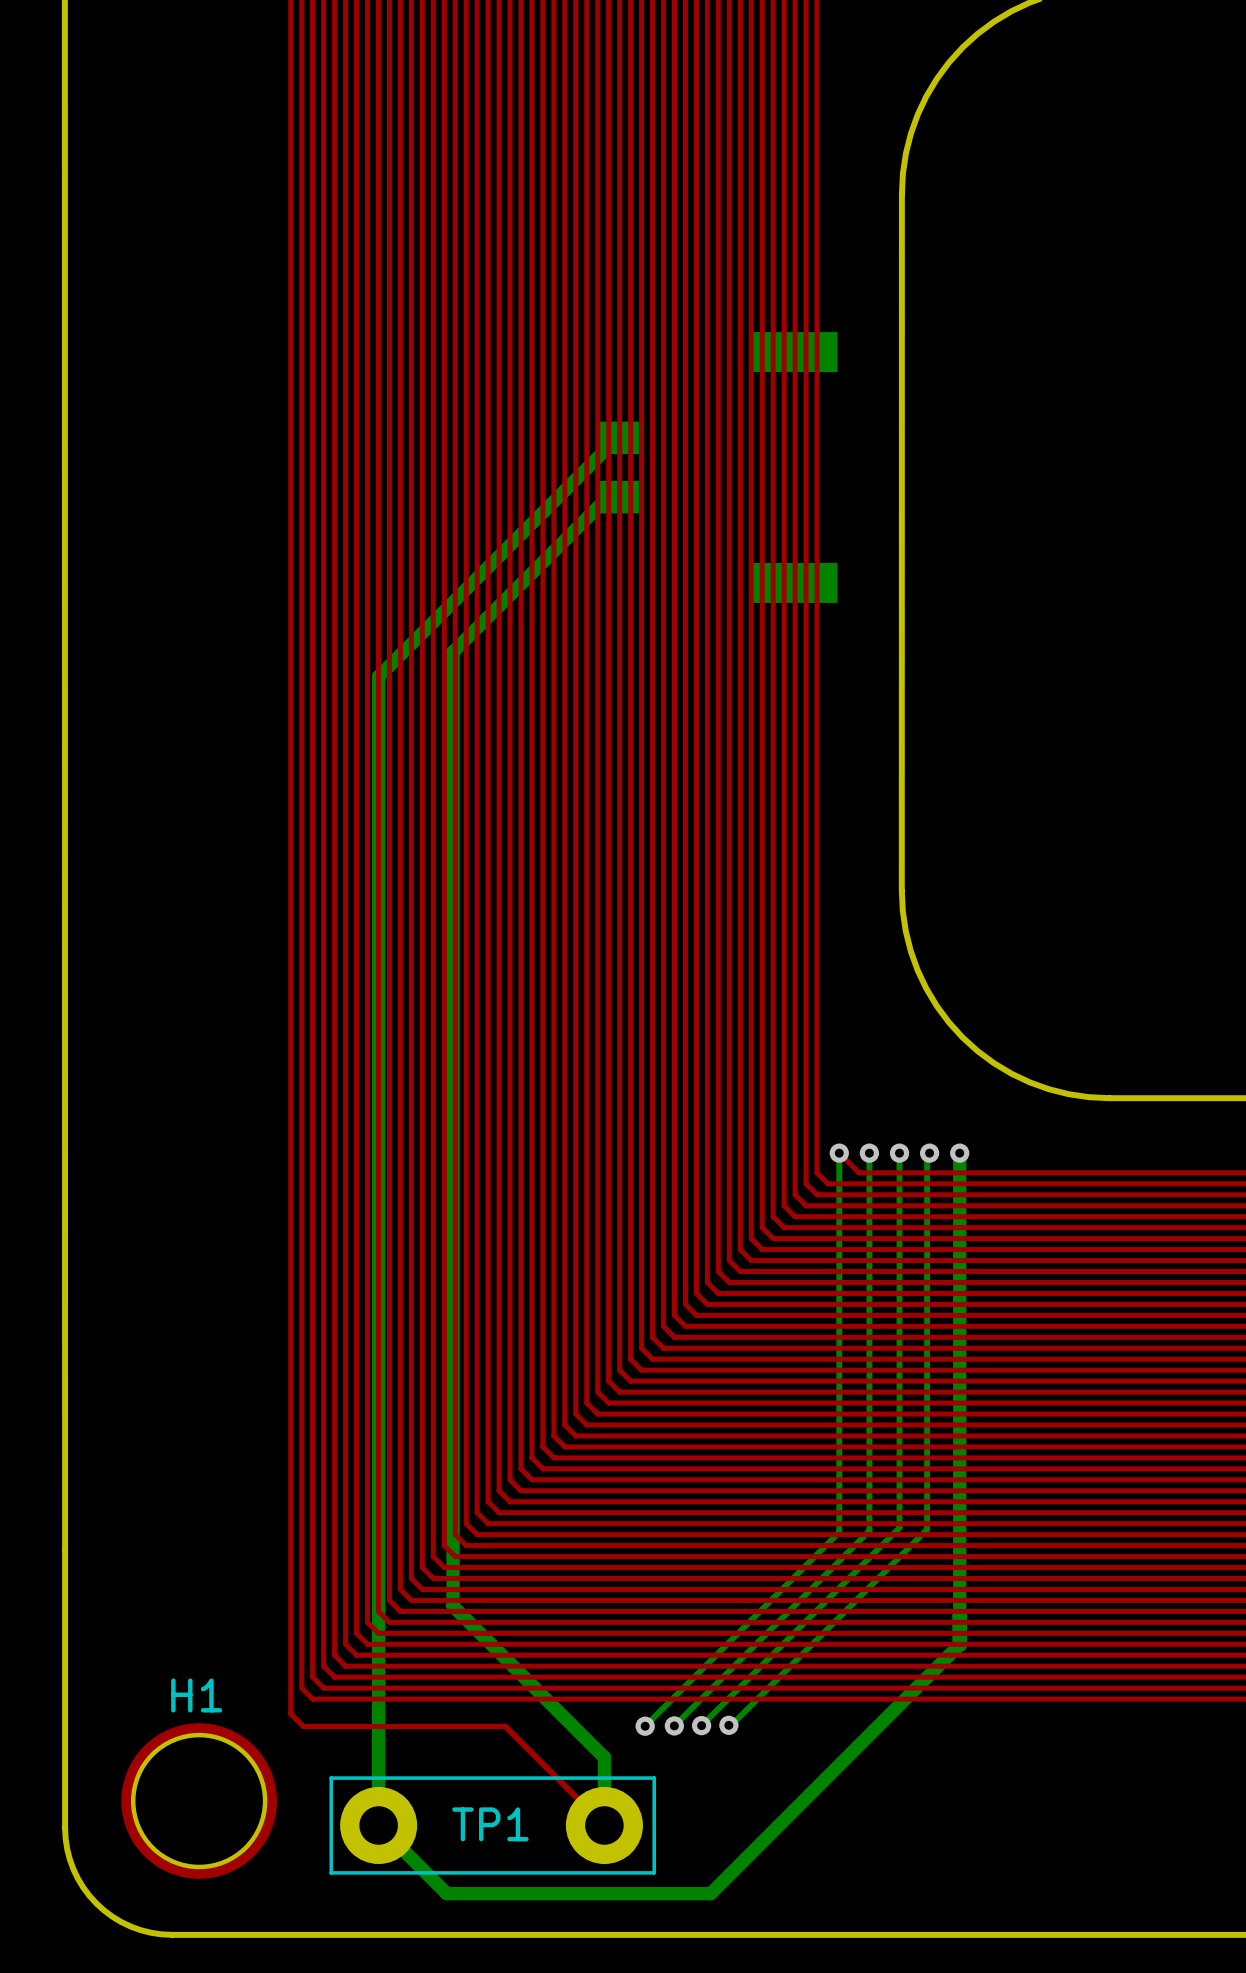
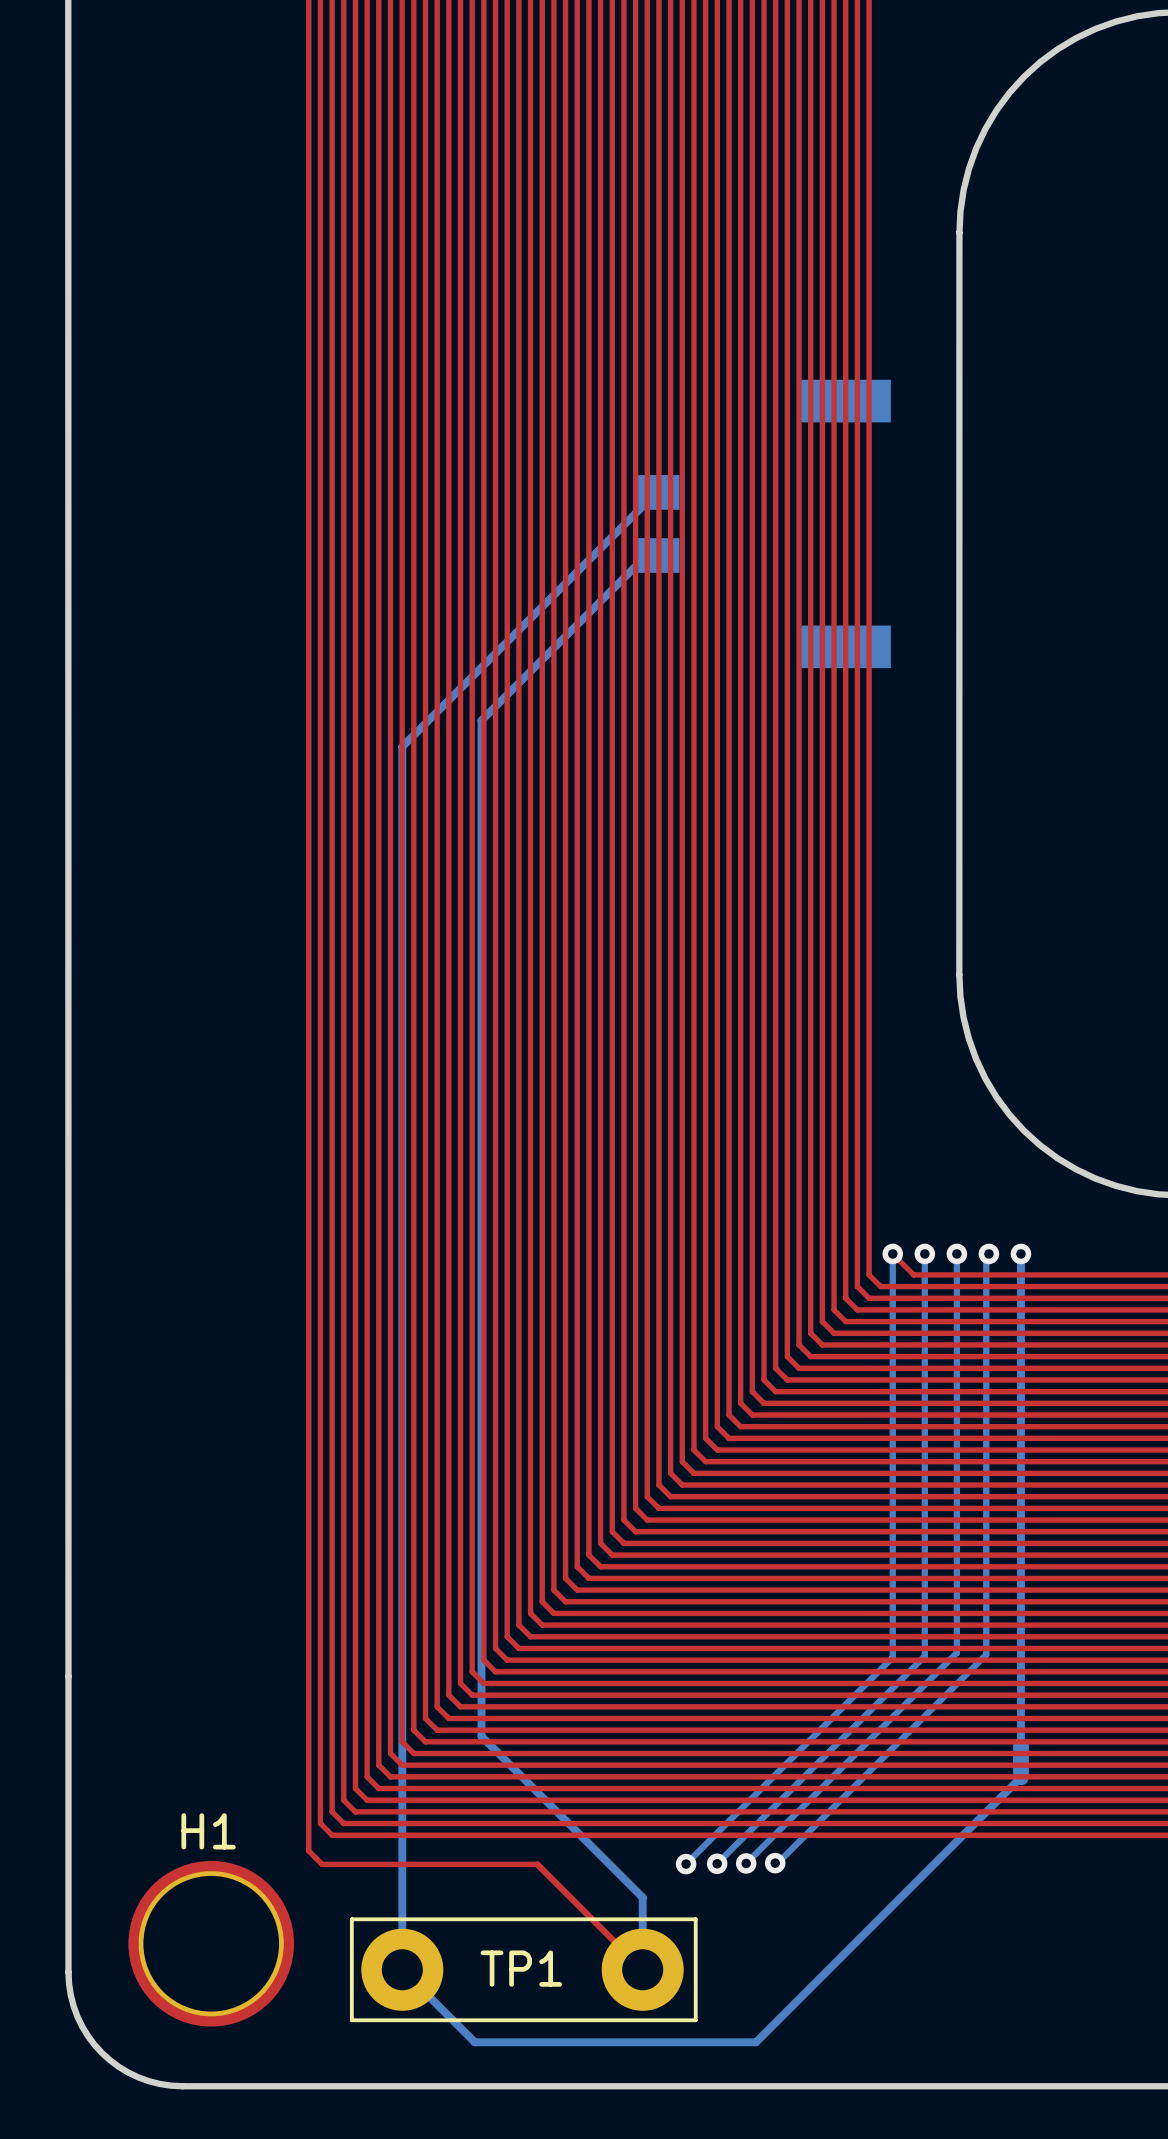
bottom track width: thick (617, 437) (378, 676) (378, 1825) (446, 1893) (710, 1893) (959, 1644) -> thin (656, 492) (402, 746) (402, 1969) (474, 2042) (755, 2042) (1020, 1777)
bottom track width: thick (607, 497) (453, 652) (453, 1606) (604, 1757) (604, 1825) -> thin (646, 555) (481, 720) (481, 1736) (642, 1897) (642, 1969)
bottom track width: thick (959, 1153) (959, 1615) -> thin (1020, 1253) (1020, 1745)

